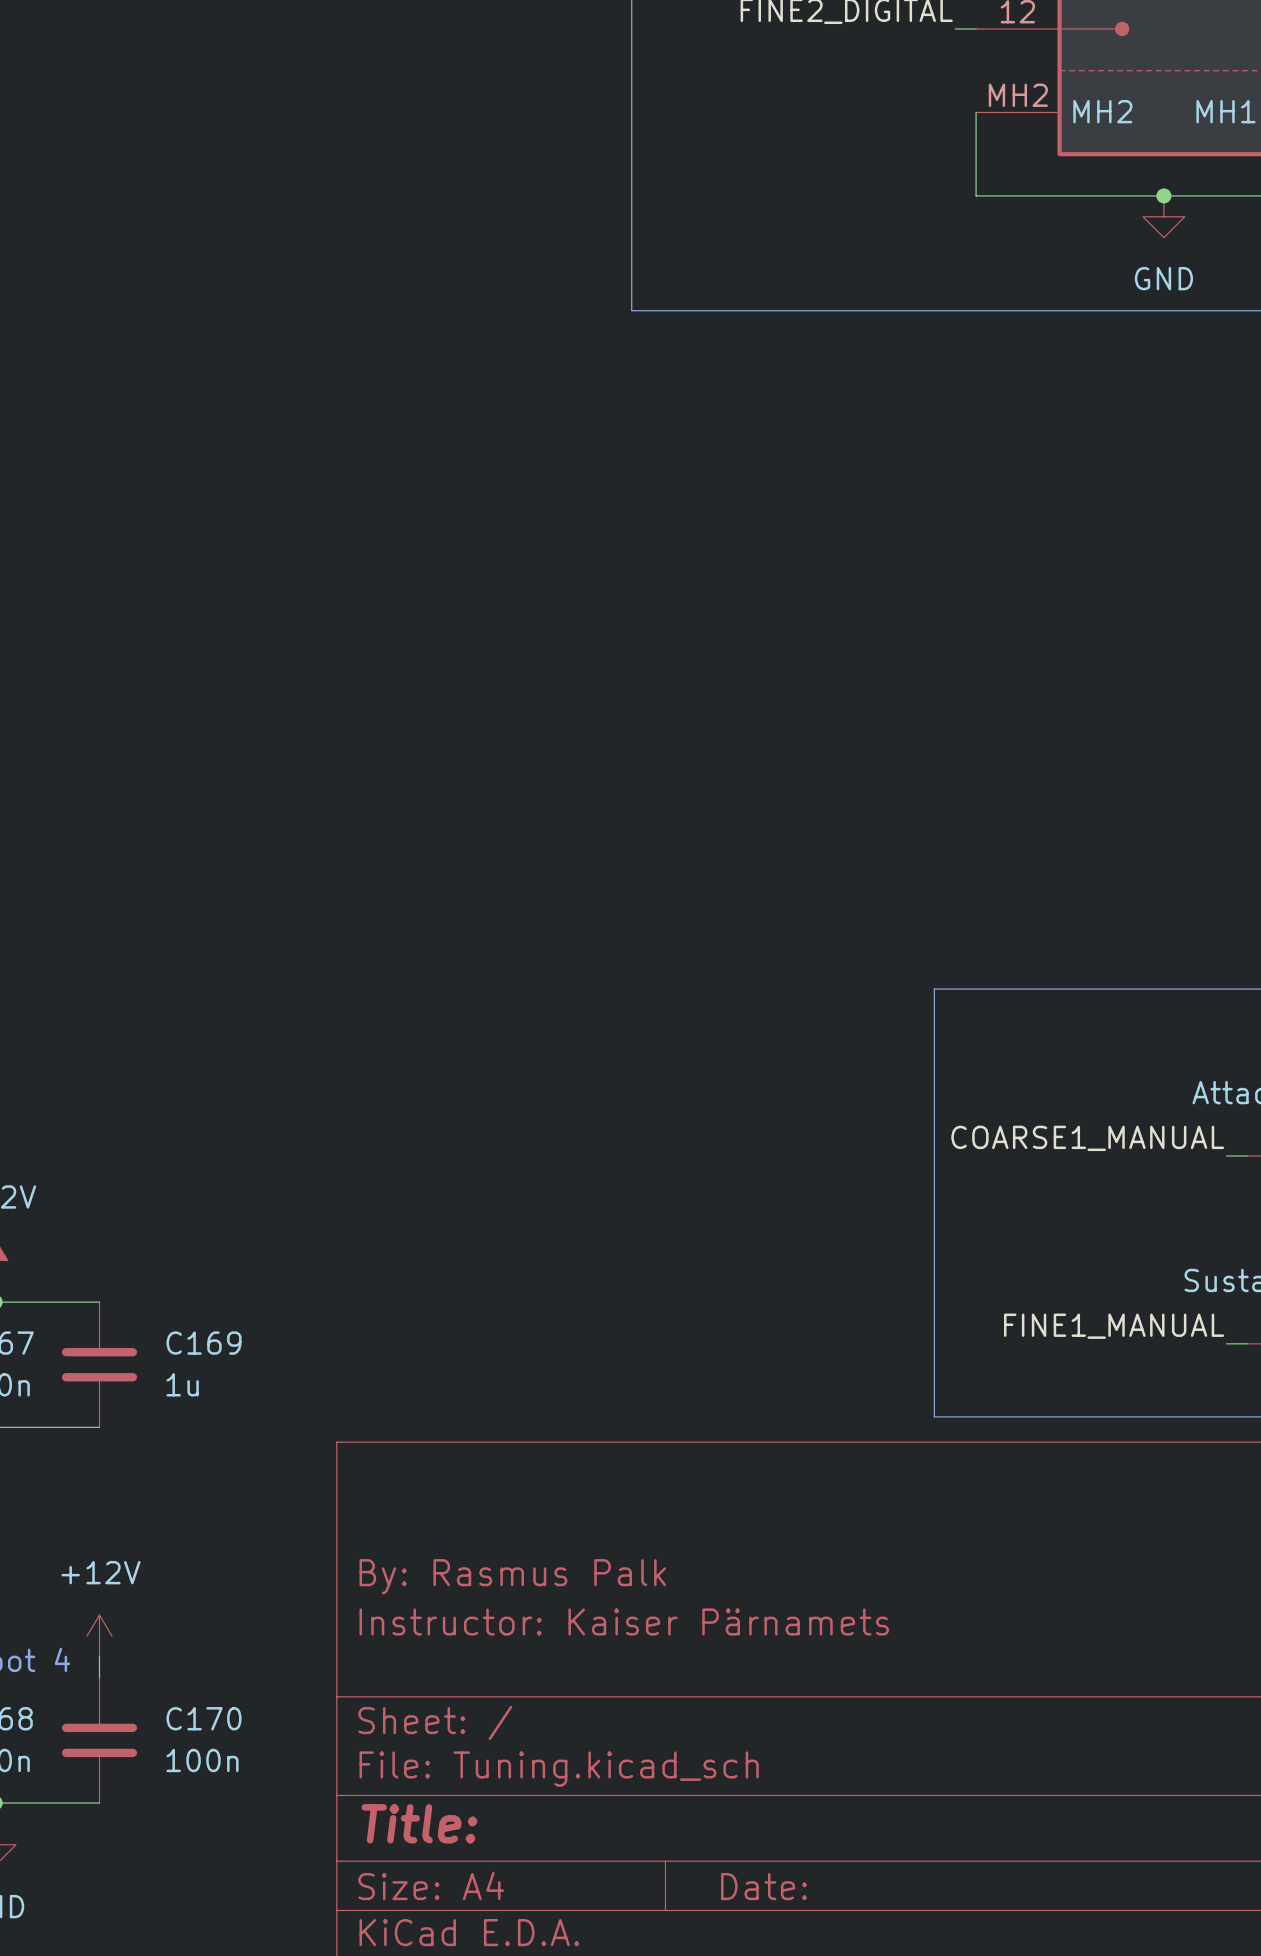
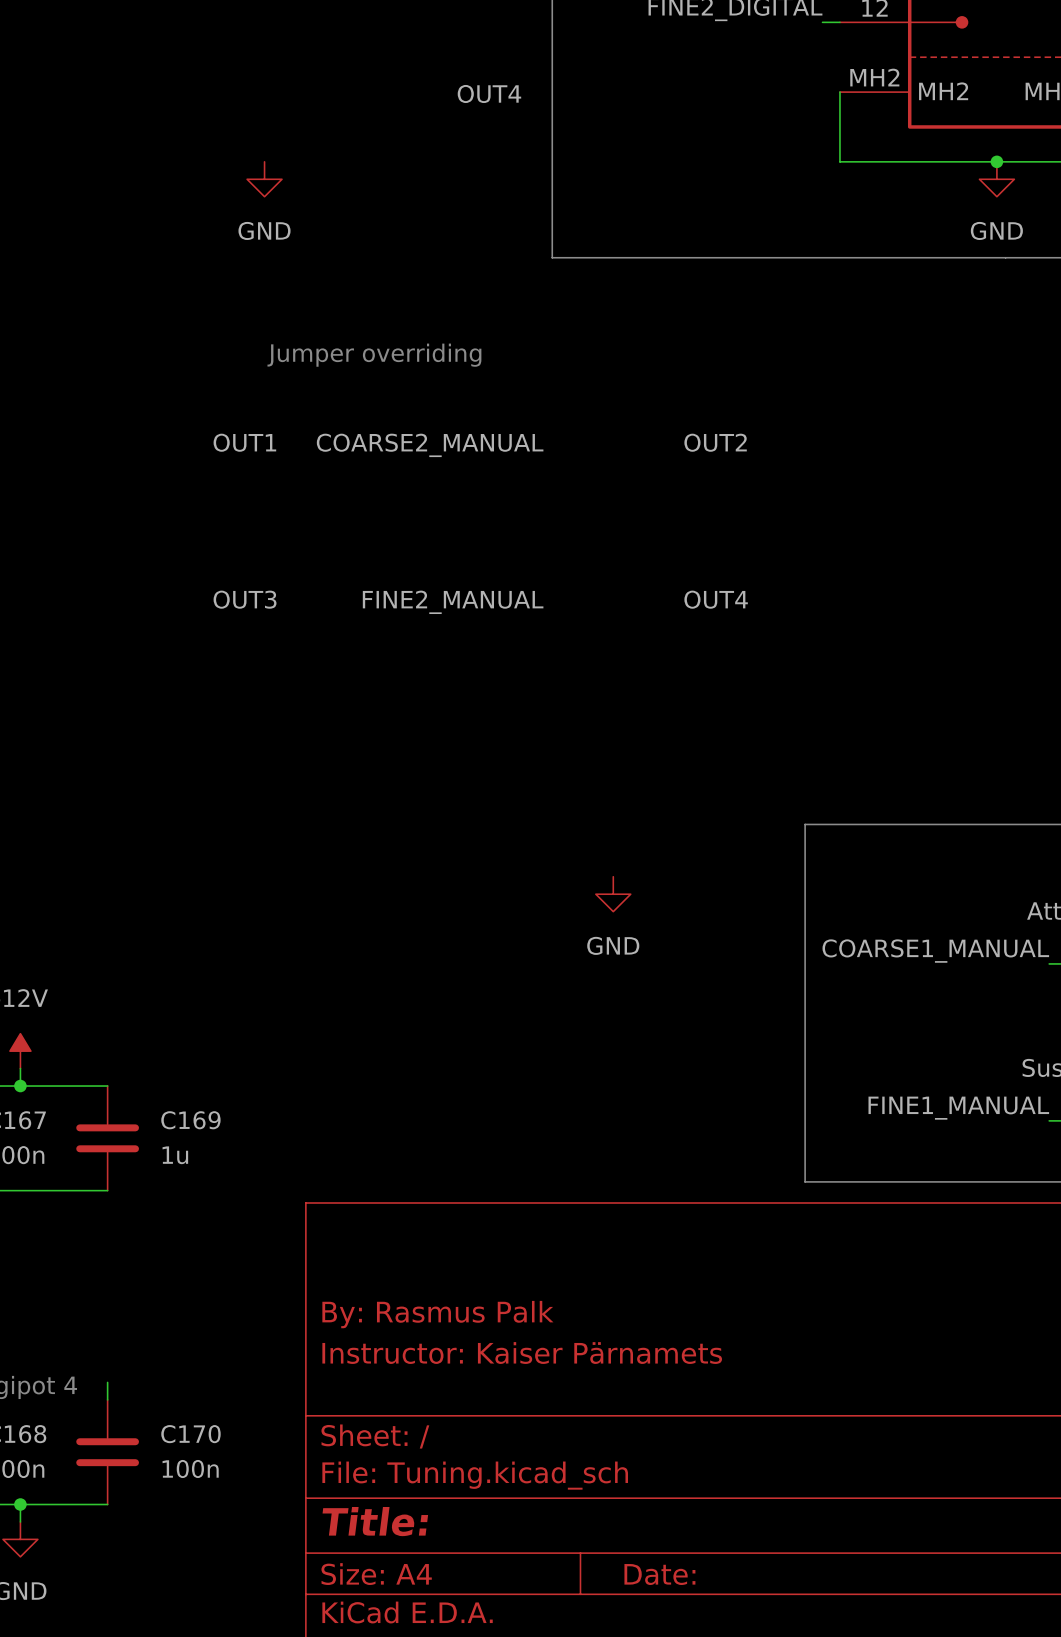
label: none -> OUT4 (489, 93)
power symbol: none -> GND (264, 179)
text: none -> Jumper overriding (374, 355)
label: none -> OUT1 (244, 442)
label: none -> OUT2 (715, 442)
label: none -> COARSE2_MANUAL (430, 445)
label: none -> OUT3 (245, 599)
label: none -> OUT4 (716, 599)
label: none -> FINE2_MANUAL (453, 602)
power symbol: none -> GND (613, 894)
power symbol: +12V (99, 1636) -> none

